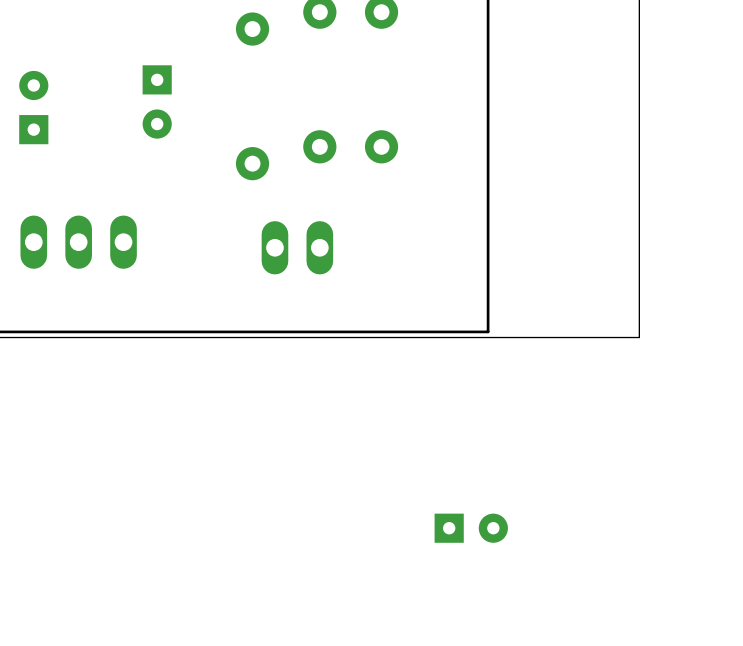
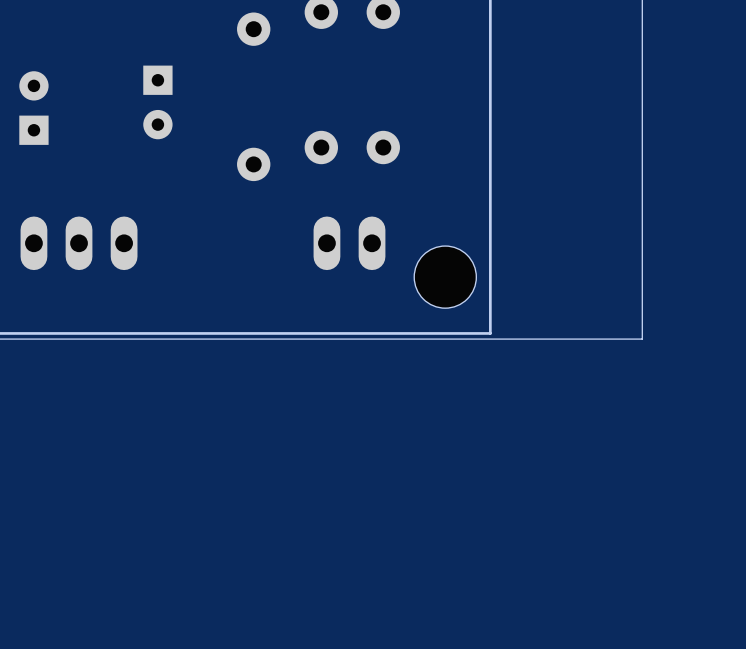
part position: (297, 247) -> (349, 243)
hole: none -> (445, 277)
part: (471, 528) -> none

